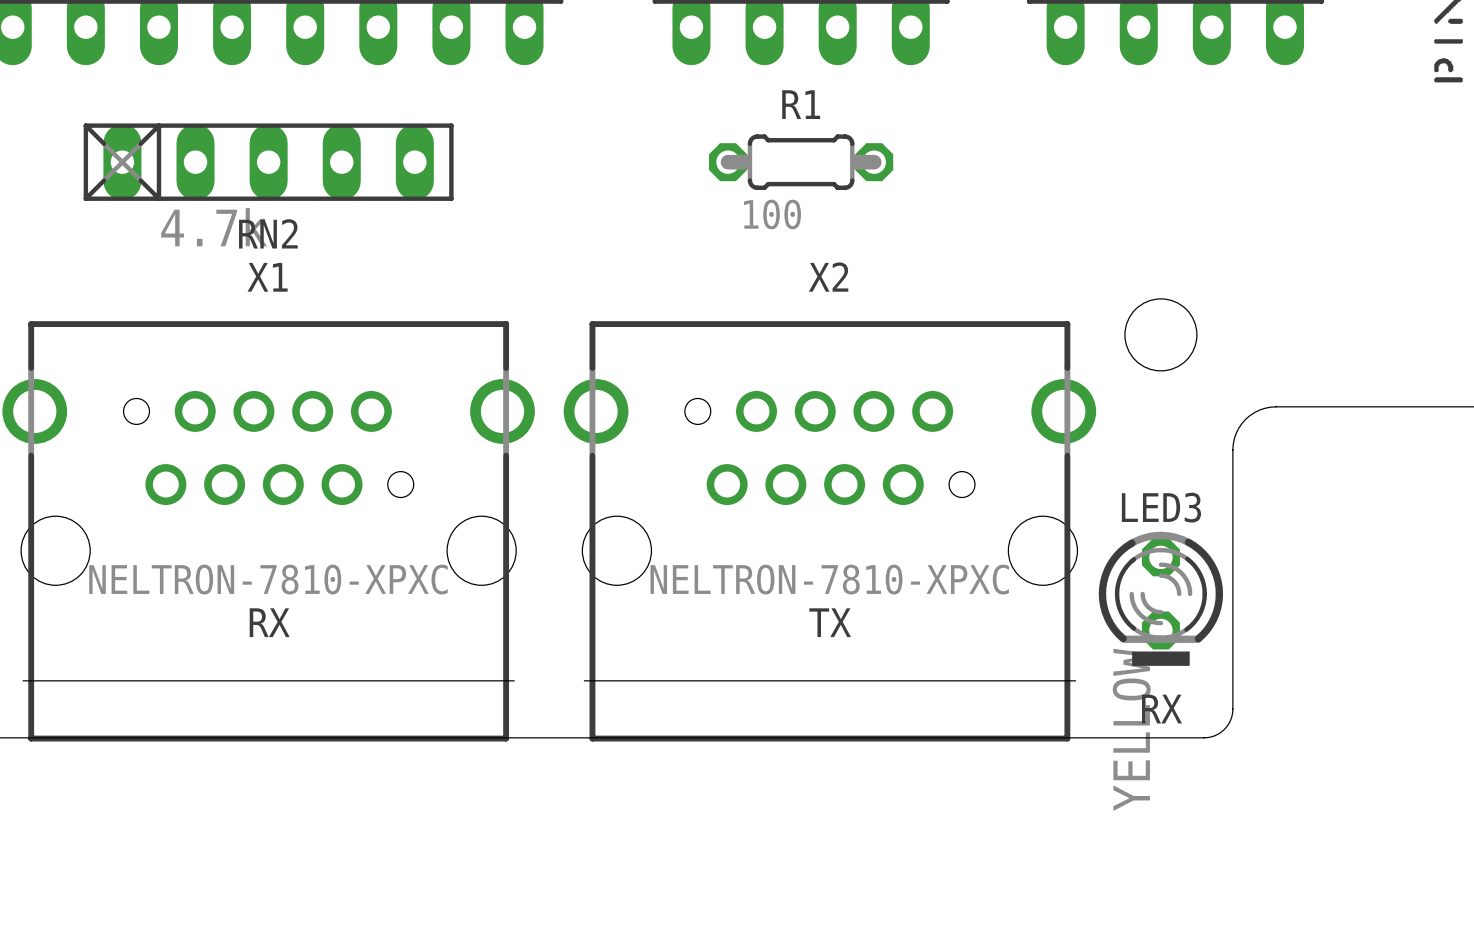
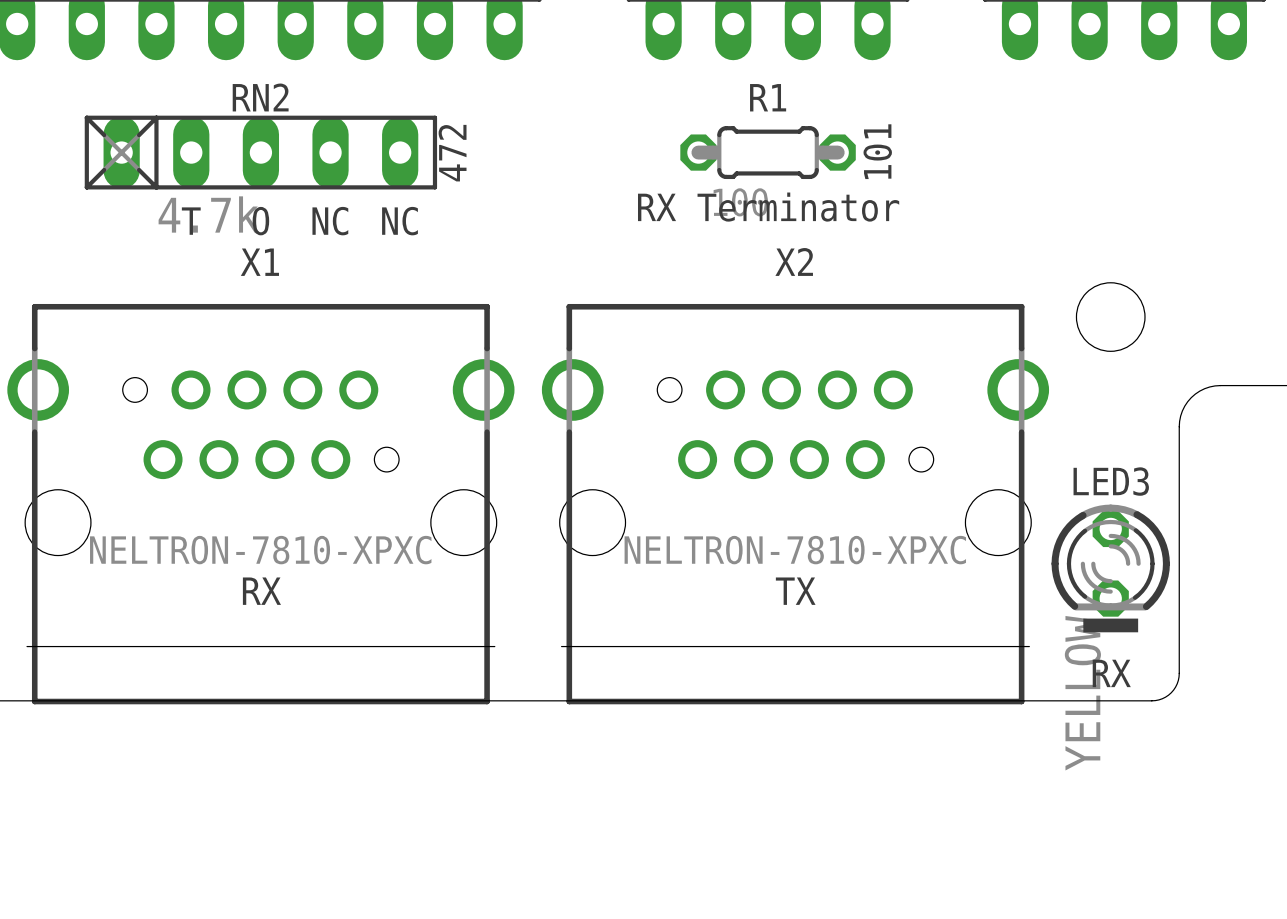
text: none -> 101 (877, 151)
text: none -> 472 (452, 153)
text: none -> RX Terminator (768, 207)
RN2 name position: RN2 (268, 233) -> RN2 (260, 97)
text: none -> T (191, 221)
text: none -> O (260, 221)
text: none -> NC (330, 221)
text: none -> NC (399, 221)

